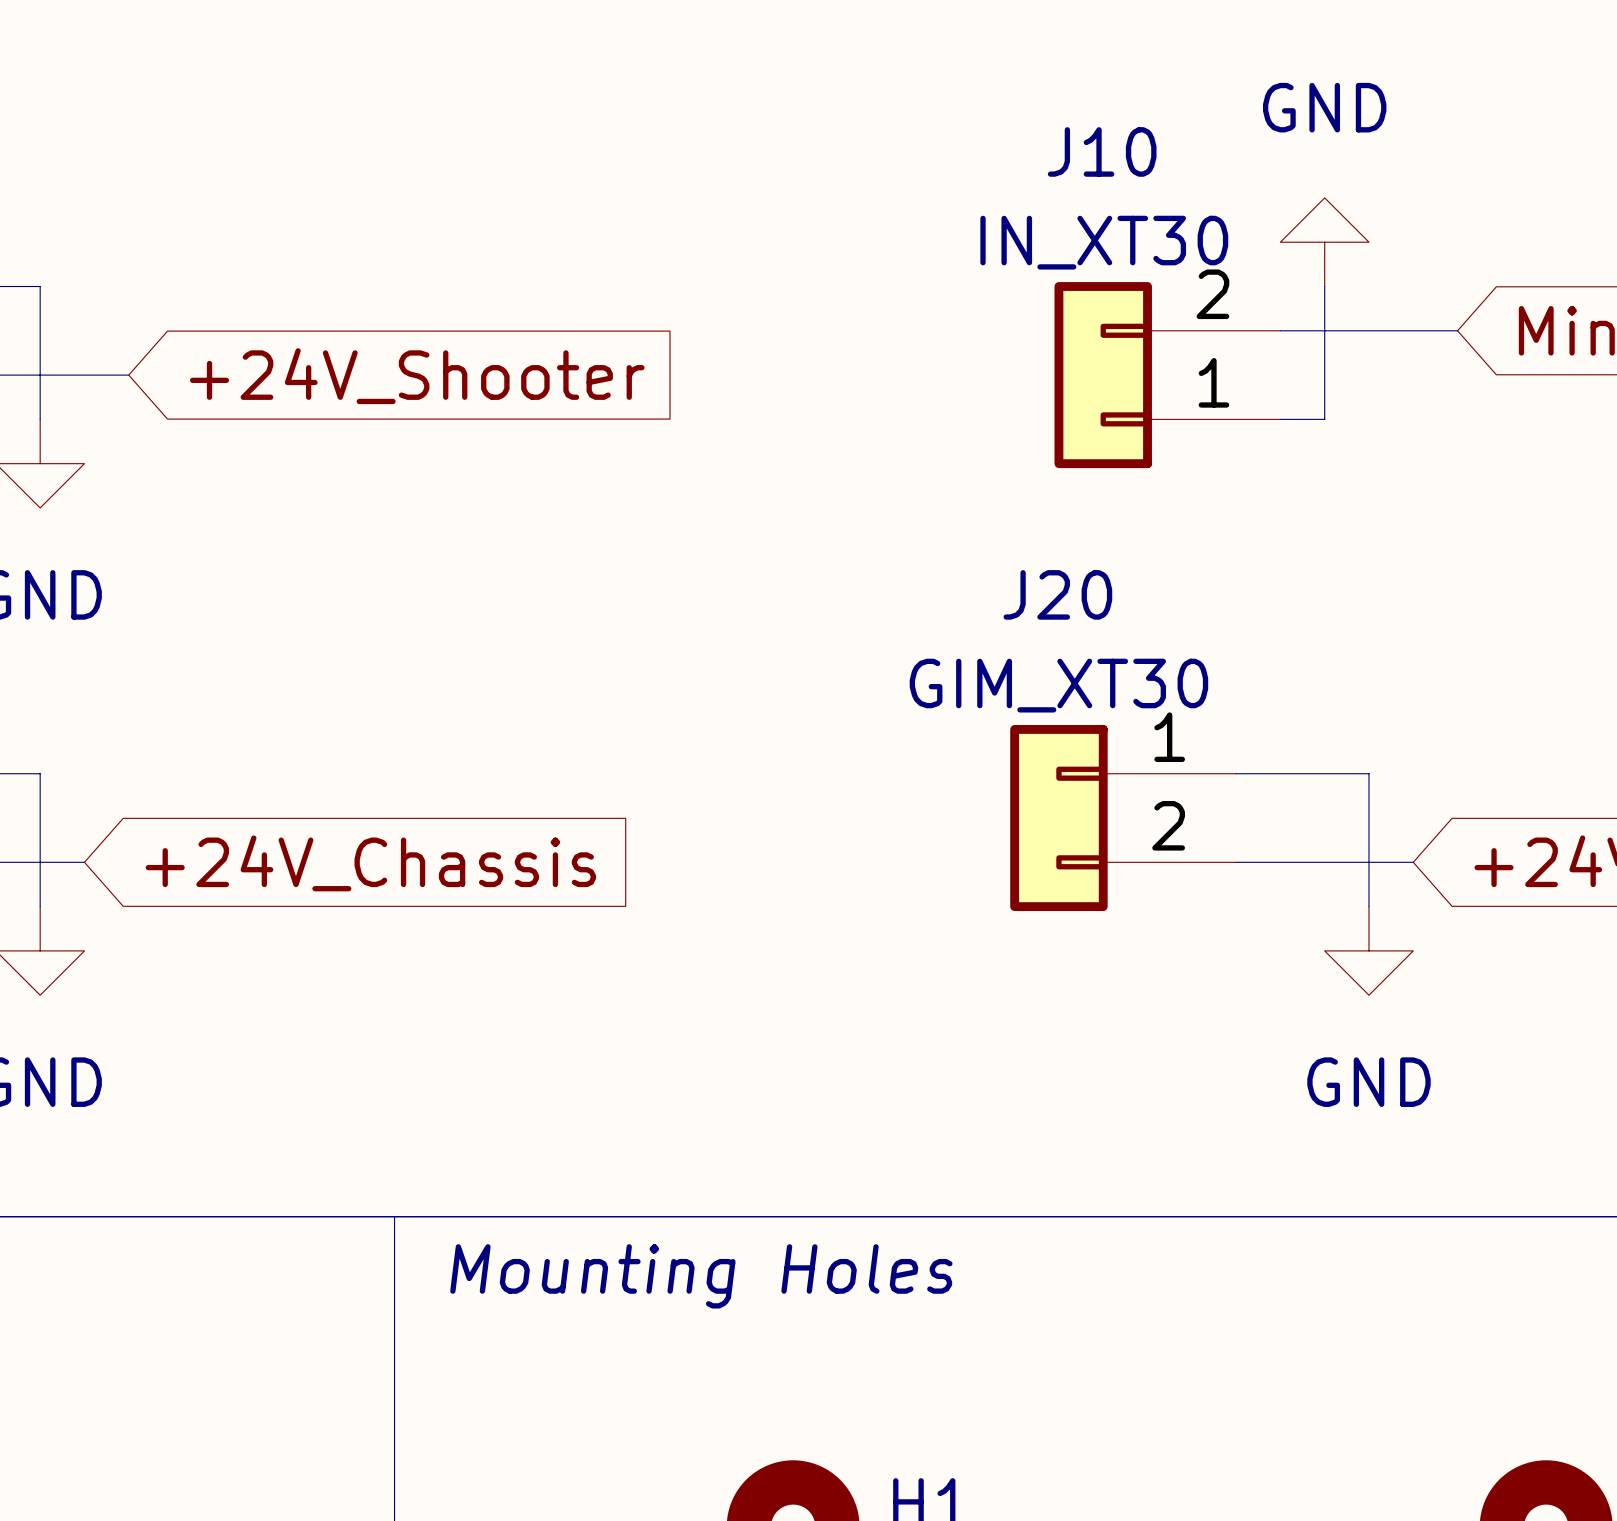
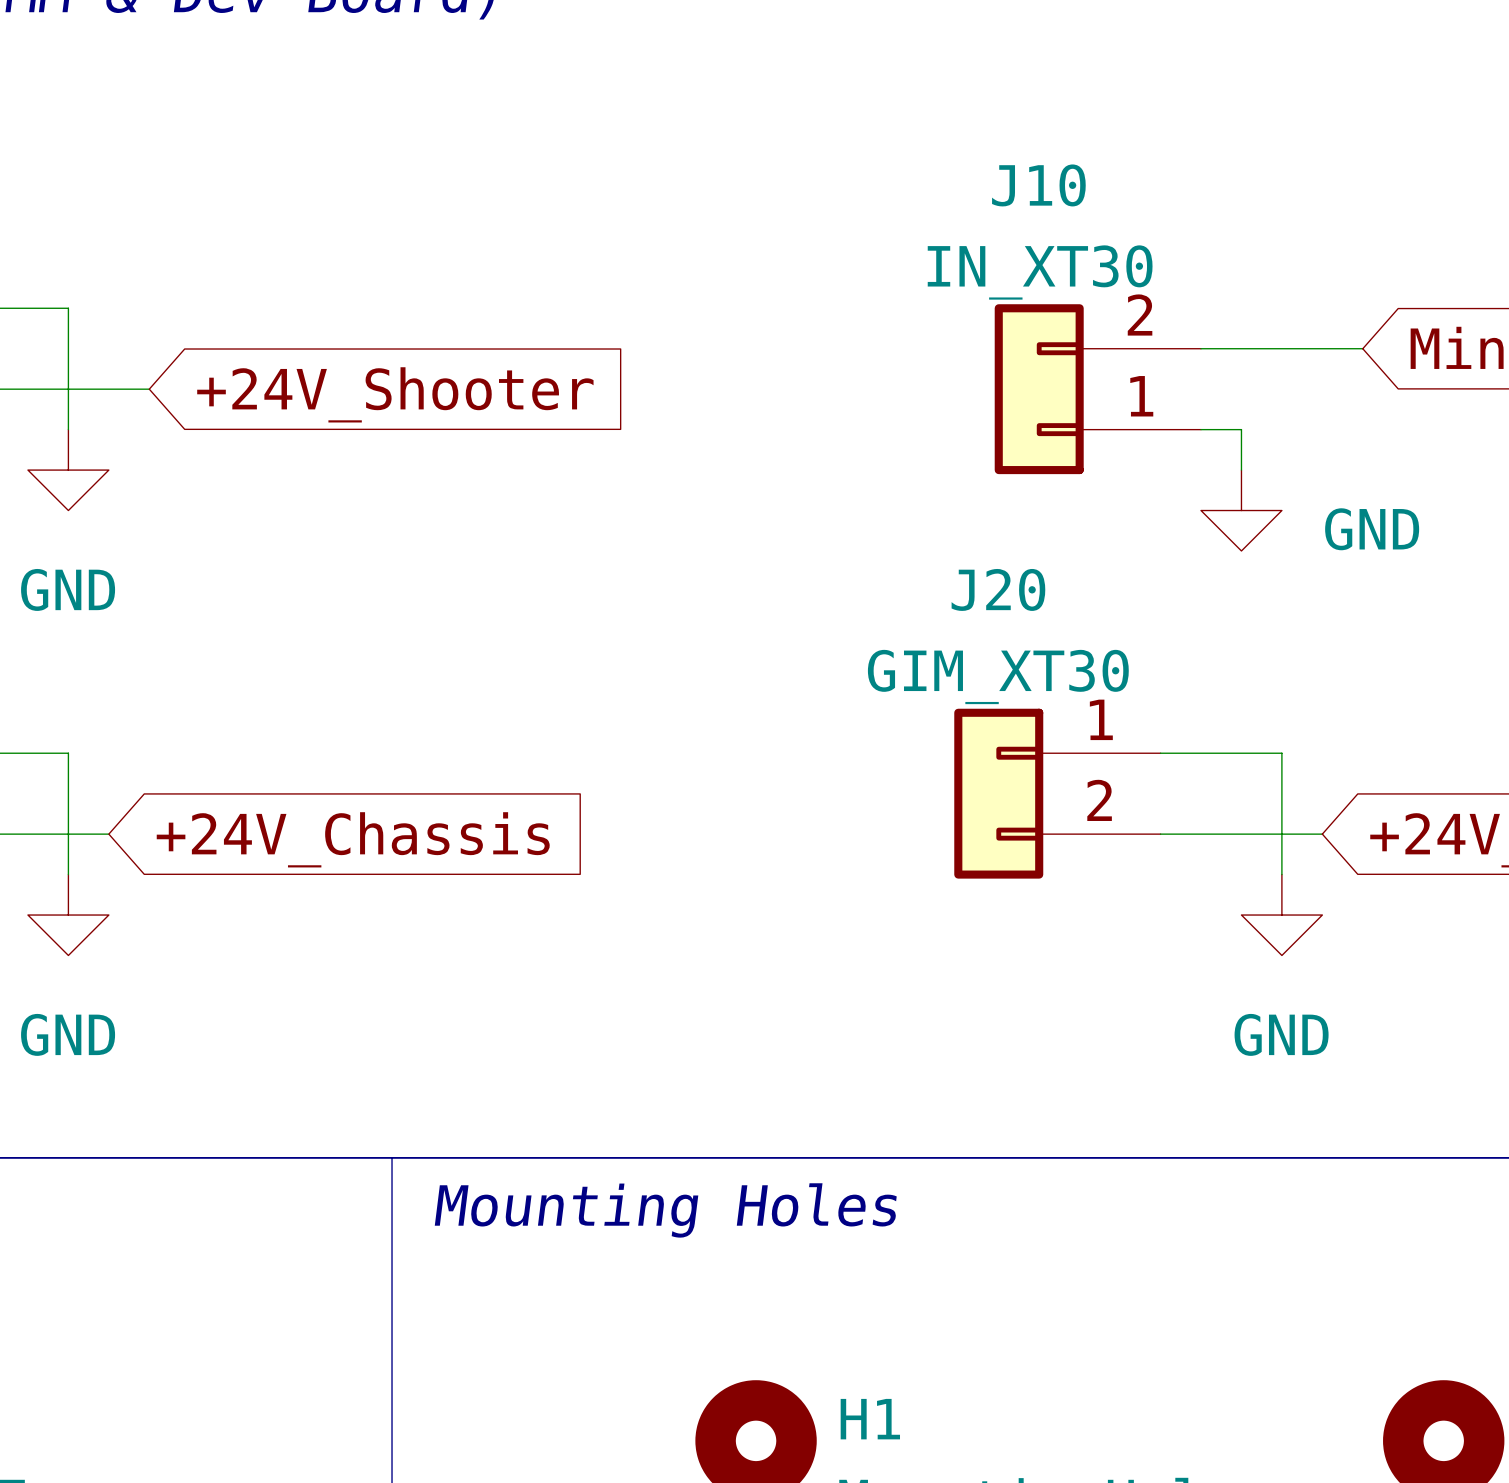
power symbol text position: GND (1324, 107) -> GND (1372, 529)
power symbol rotation: 0° (1324, 242) -> 180° (1241, 510)
power symbol position: GND (1324, 242) -> GND (1241, 510)
wire: (1324, 286) (1324, 419) -> (1241, 470) (1241, 429)

